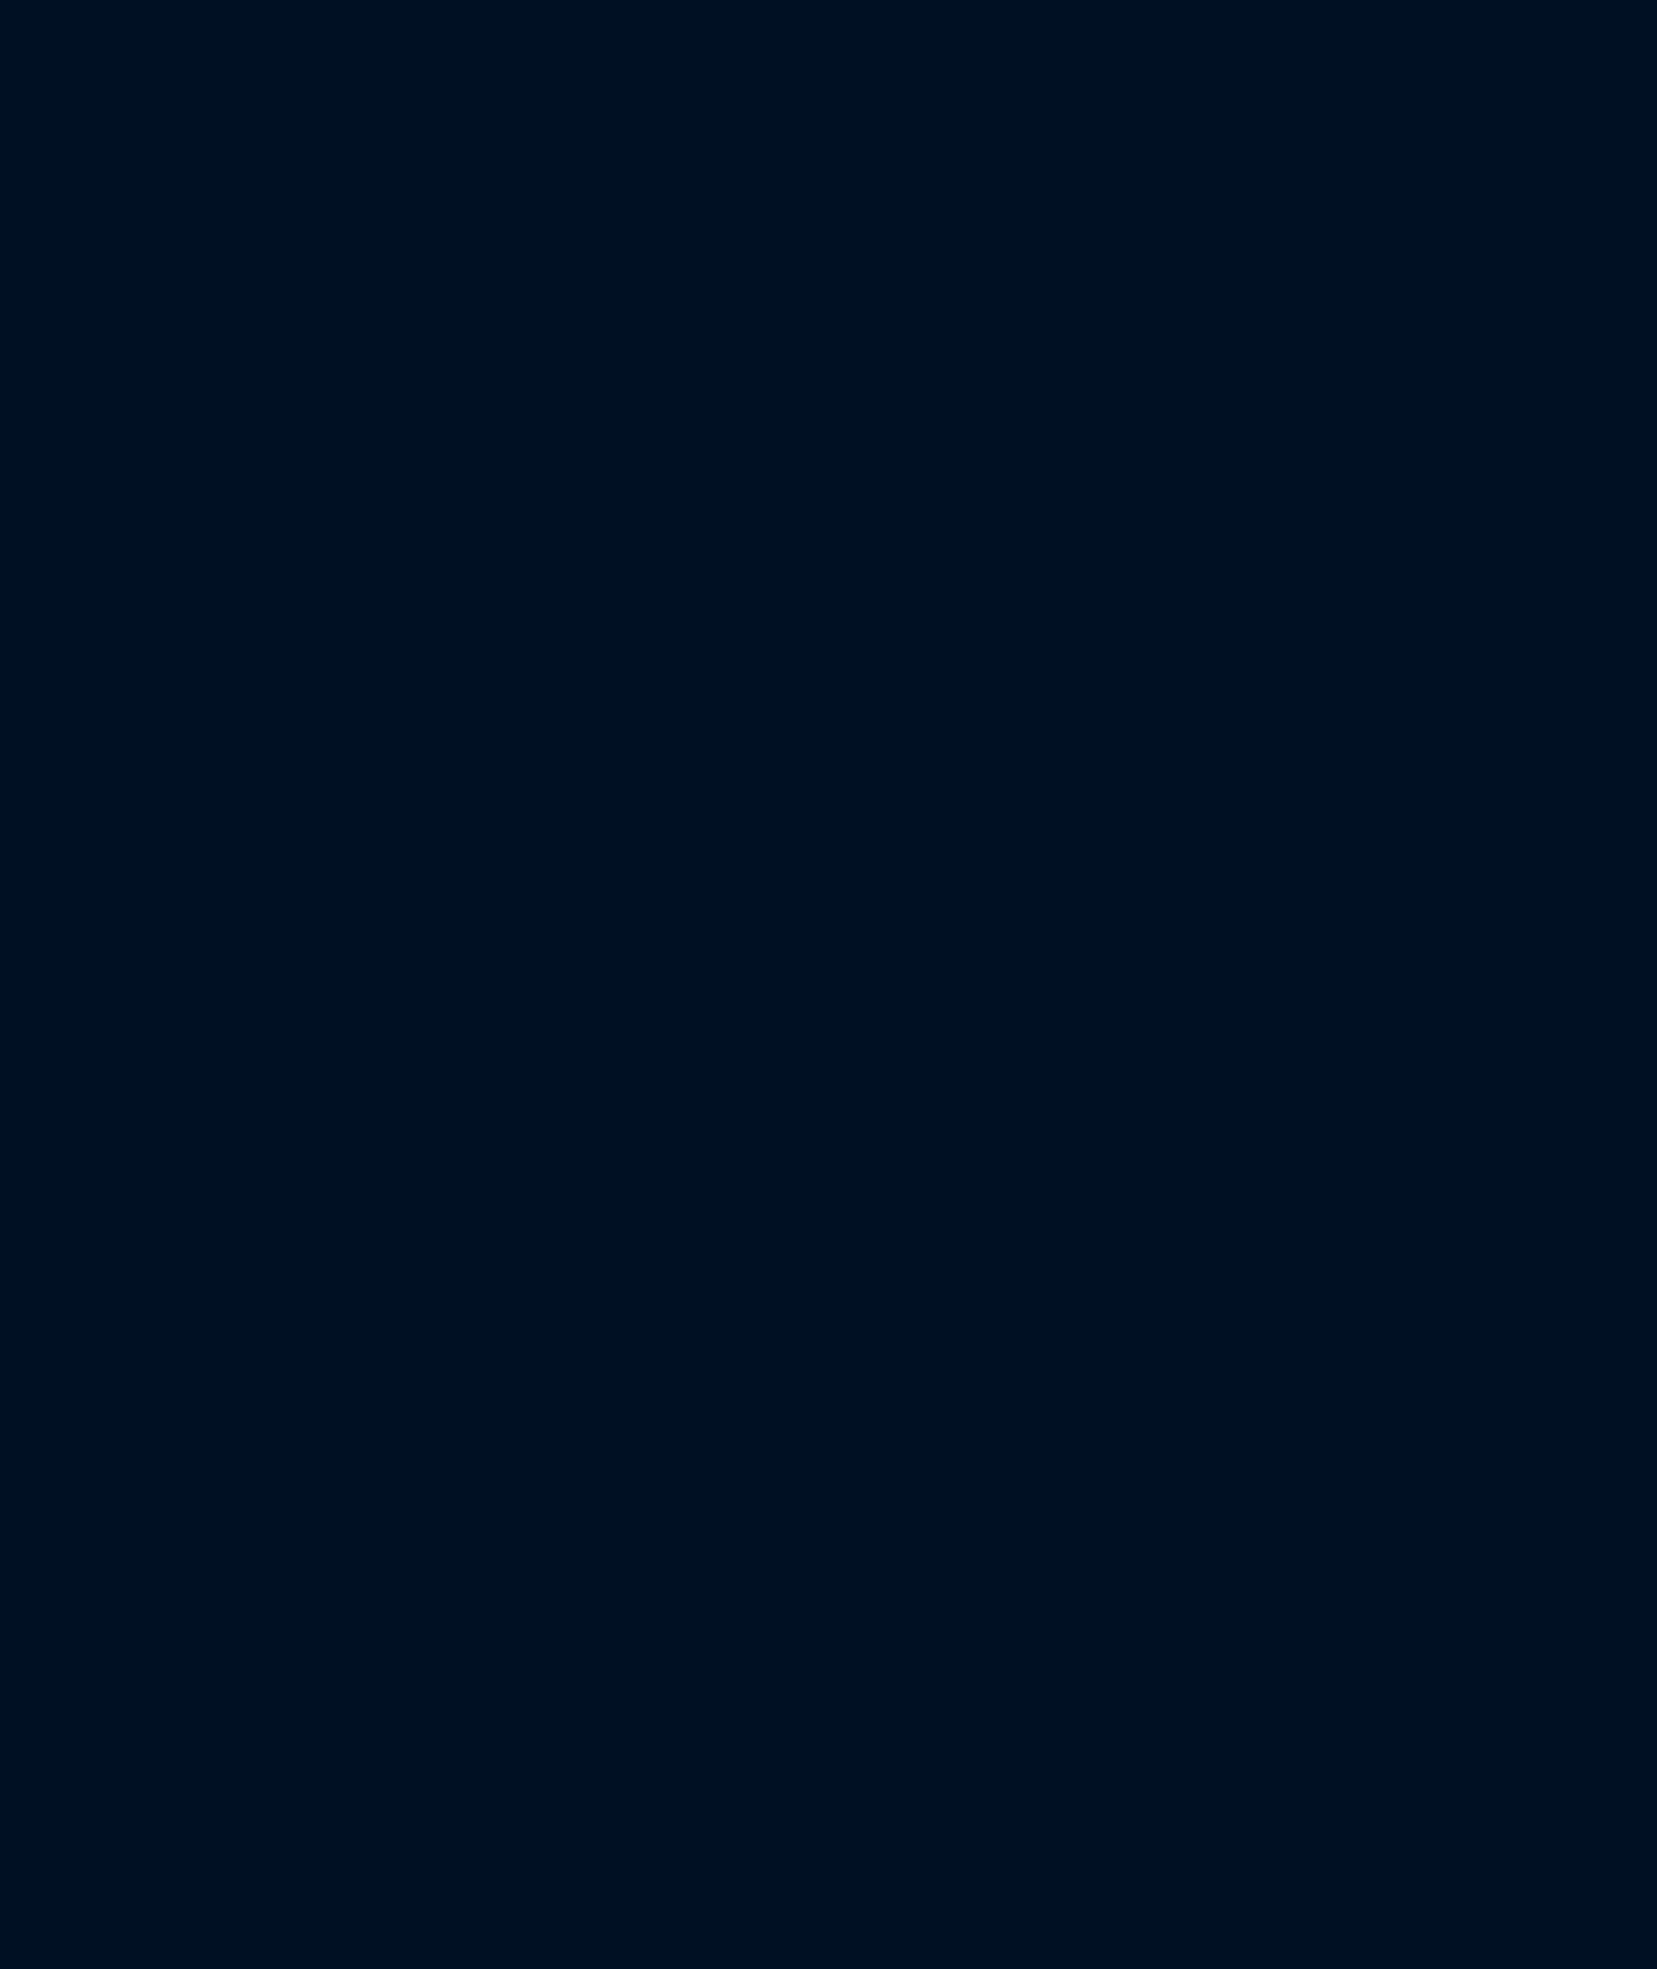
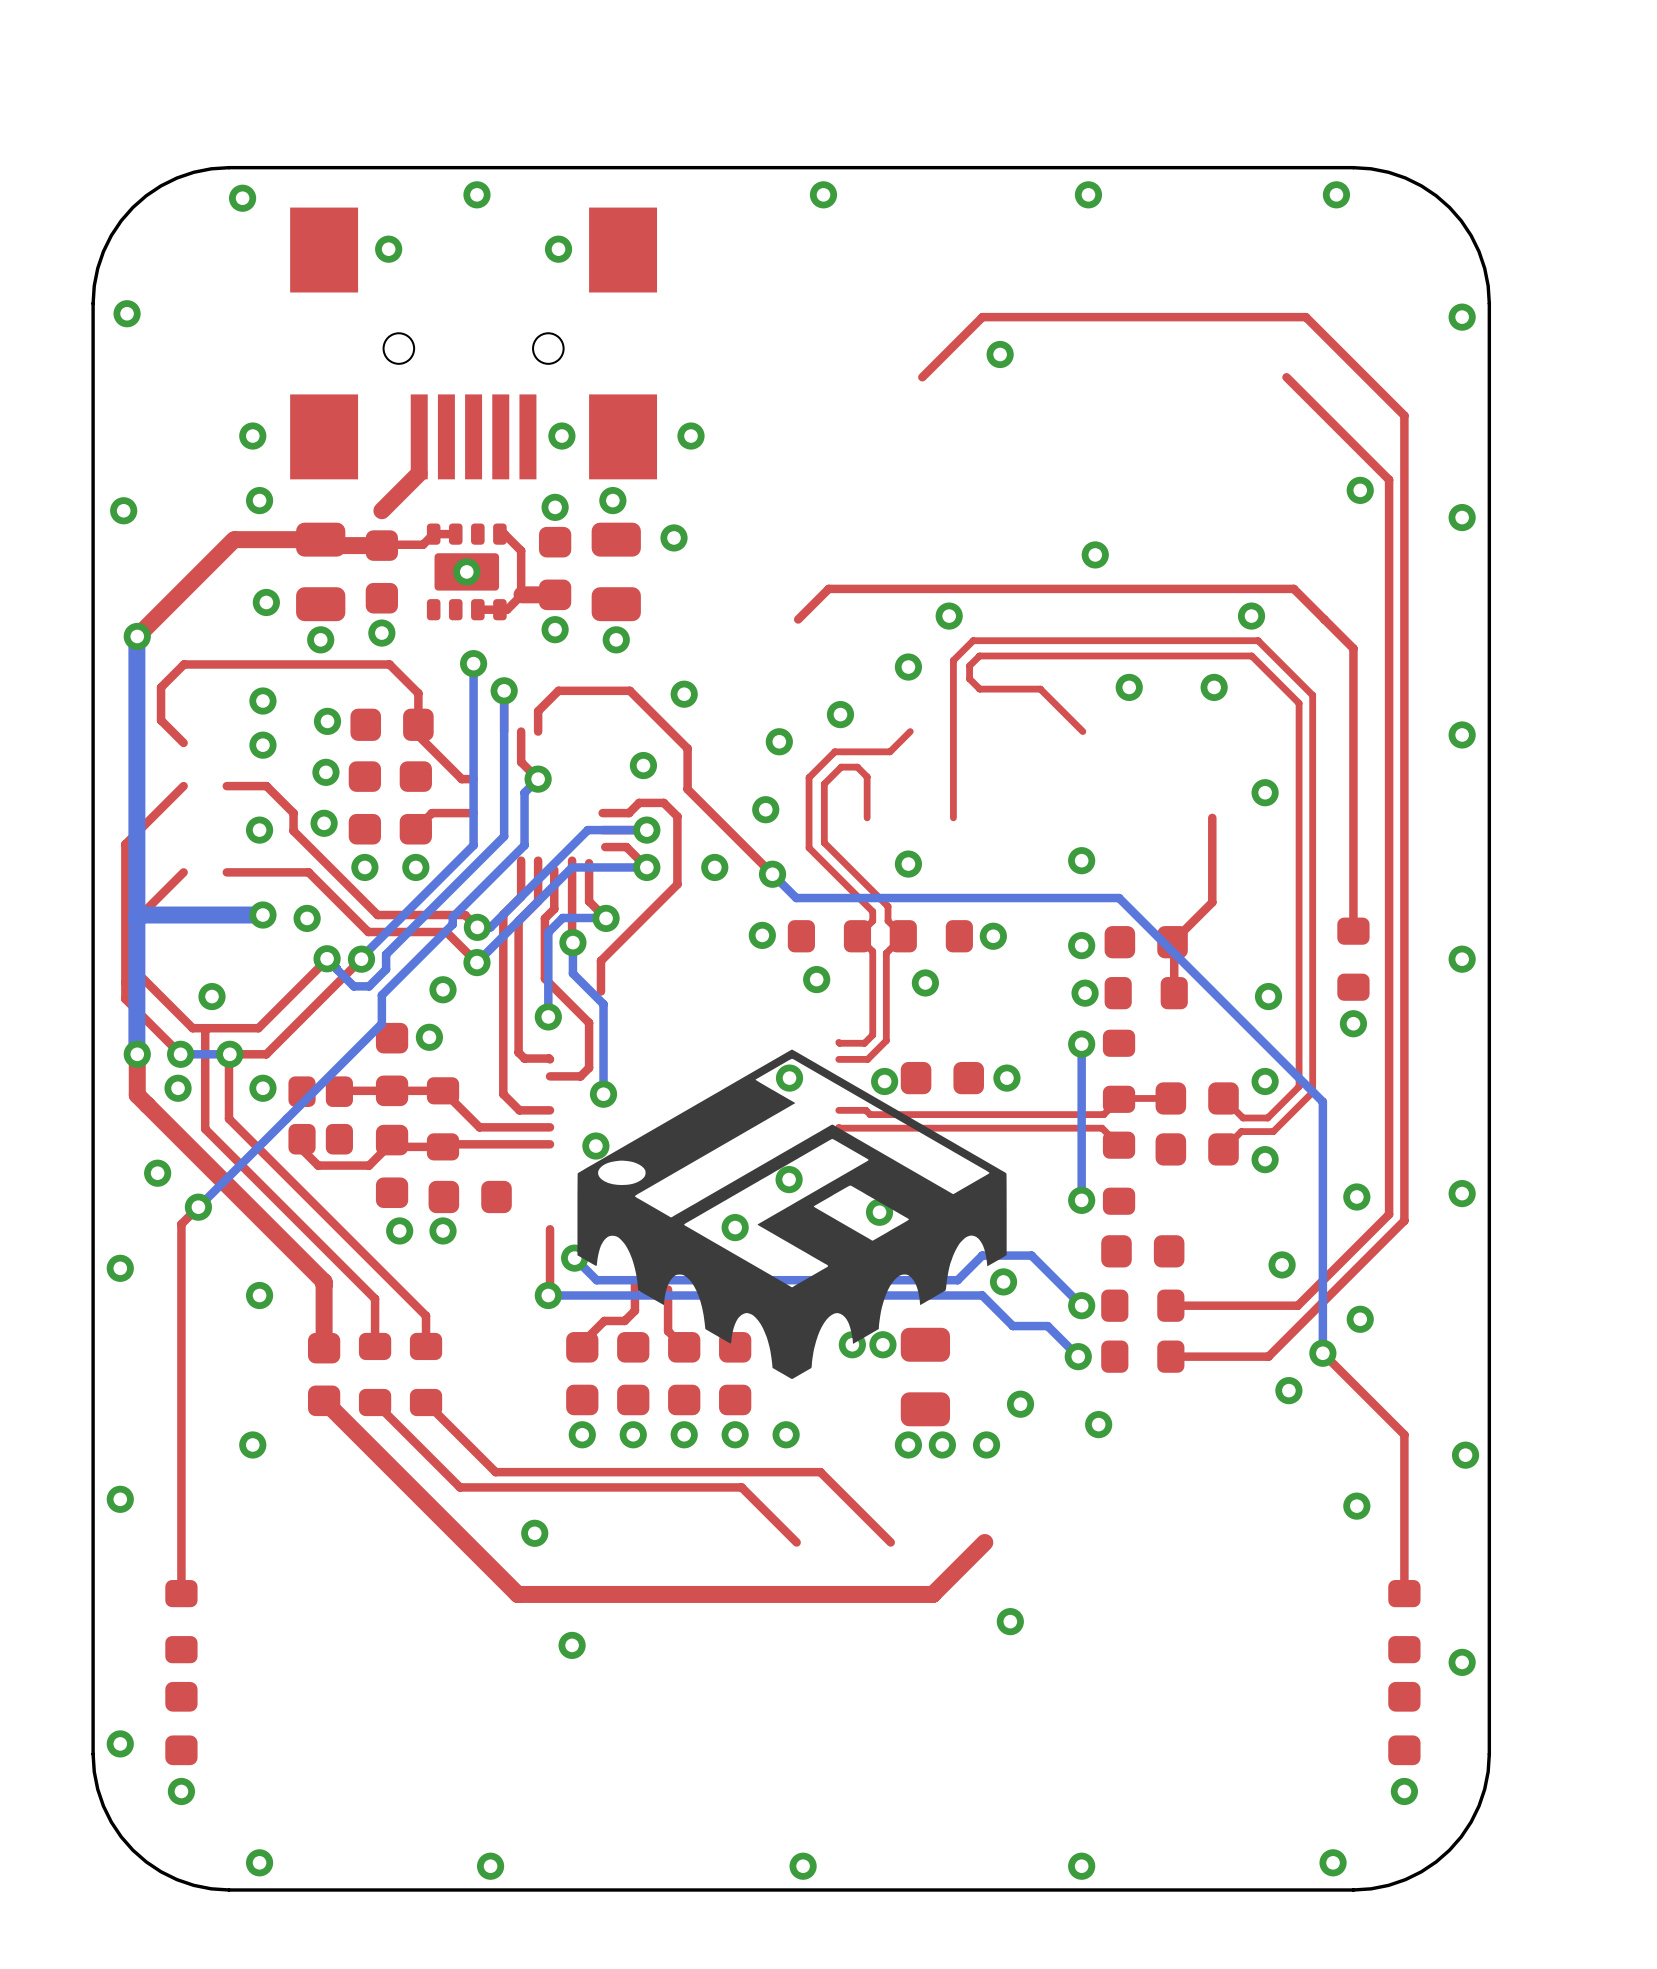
board edge: none -> (1353, 167) (228, 167) (193, 172) (161, 185) (132, 207) (121, 220) (111, 235) (97, 268) (93, 303) (93, 1754) (97, 1789) (111, 1822) (132, 1850) (146, 1861) (161, 1871) (193, 1885) (228, 1890) (1353, 1890) (1388, 1885) (1421, 1871) (1449, 1850) (1461, 1836) (1471, 1822) (1484, 1789) (1489, 1754) (1489, 303) (1488, 285) (1478, 251) (1471, 235) (1449, 207) (1421, 185) (1405, 178) (1371, 168) (1353, 167)
via: none -> (476, 194)
via: none -> (823, 194)
via: none -> (1088, 194)
via: none -> (1336, 194)
via: none -> (242, 198)
via: none -> (388, 249)
via: none -> (558, 249)
via: none -> (127, 313)
via: none -> (1462, 317)
part: none -> (473, 343)
via: none -> (1000, 354)
top track: none -> (922, 377) (982, 317) (1305, 317) (1404, 415) (1404, 1220) (1268, 1356) (1170, 1356)
top track: none -> (1286, 377) (1389, 479) (1389, 1214) (1297, 1305) (1170, 1305)
via: none -> (252, 436)
top track: none -> (419, 436) (419, 473) (381, 510)
via: none -> (561, 436)
via: none -> (691, 436)
via: none -> (1360, 490)
via: none -> (259, 500)
via: none -> (612, 500)
via: none -> (555, 507)
via: none -> (123, 510)
via: none -> (1462, 517)
top track: none -> (455, 534) (433, 534) (423, 544) (326, 545) (320, 539) (235, 539)
top track: none -> (499, 534) (504, 534) (521, 550) (521, 595)
via: none -> (674, 537)
top track: none -> (234, 539) (137, 636)
via: none -> (1095, 554)
part: none -> (555, 568)
part: none -> (320, 571)
part: none -> (381, 571)
part: none -> (466, 571)
via: none -> (466, 571)
part: none -> (616, 571)
top track: none -> (555, 594) (521, 594) (507, 609) (477, 609)
via: none -> (266, 602)
via: none -> (949, 616)
via: none -> (1251, 616)
top track: none -> (798, 619) (828, 588) (1293, 588) (1353, 648) (1353, 931)
via: none -> (555, 629)
via: none -> (381, 633)
bottom track: none -> (136, 636) (136, 1053)
via: none -> (137, 636)
via: none -> (320, 639)
via: none -> (616, 639)
bottom track: none -> (473, 663) (473, 845) (361, 959)
via: none -> (473, 663)
via: none -> (908, 667)
via: none -> (1129, 687)
via: none -> (1214, 687)
bottom track: none -> (504, 690) (504, 836) (386, 954) (386, 969) (369, 986) (353, 986) (327, 958)
via: none -> (504, 690)
via: none -> (684, 694)
via: none -> (262, 701)
via: none -> (840, 714)
via: none -> (327, 721)
part: none -> (392, 724)
top track: none -> (521, 731) (521, 762) (538, 779)
top track: none -> (538, 731) (538, 711) (558, 690) (629, 690) (687, 748) (687, 789) (772, 874)
top track: none -> (910, 731) (890, 751) (834, 751) (809, 777) (809, 847) (872, 911) (872, 920) (857, 936) (872, 951) (872, 1035) (864, 1043) (838, 1042)
top track: none -> (1082, 731) (1040, 689) (979, 689) (969, 678) (969, 665) (979, 655) (1251, 655) (1299, 703) (1299, 1086) (1267, 1118) (1243, 1118) (1223, 1098)
via: none -> (1462, 734)
via: none -> (779, 741)
top track: none -> (183, 742) (161, 720) (161, 687) (183, 664) (389, 664) (418, 693) (418, 735) (461, 779) (473, 779)
via: none -> (262, 745)
via: none -> (643, 765)
via: none -> (325, 772)
bottom track: none -> (538, 779) (524, 792) (524, 845) (452, 917) (452, 924) (381, 995) (381, 1023) (198, 1207)
via: none -> (538, 779)
top track: none -> (183, 786) (125, 844) (125, 999) (180, 1054)
top track: none -> (226, 786) (266, 786) (293, 813) (293, 830) (377, 915) (465, 915) (477, 927)
via: none -> (1265, 792)
part: none -> (364, 802)
part: none -> (415, 802)
via: none -> (765, 809)
top track: none -> (473, 813) (431, 813) (415, 829)
top track: none -> (602, 813) (628, 813) (639, 802) (663, 802) (677, 816) (677, 884) (600, 960) (600, 991)
top track: none -> (867, 817) (867, 776) (857, 767) (841, 767) (824, 784) (824, 842) (888, 906) (888, 920) (903, 936) (886, 953) (886, 1040) (867, 1059) (838, 1059)
top track: none -> (953, 817) (953, 660) (973, 640) (1258, 640) (1312, 695) (1312, 1092) (1273, 1131) (1241, 1131) (1223, 1149)
top track: none -> (1212, 817) (1212, 902) (1172, 942) (1174, 943) (1174, 993)
via: none -> (324, 823)
via: none -> (259, 830)
bottom track: none -> (646, 830) (587, 830) (490, 927) (477, 927)
via: none -> (646, 830)
top track: none -> (605, 847) (626, 847) (646, 867)
top track: none -> (521, 860) (521, 896) (503, 914) (503, 1094) (519, 1110) (550, 1110)
top track: none -> (538, 860) (538, 901) (518, 920) (518, 1052) (524, 1058) (550, 1059)
top track: none -> (572, 860) (572, 942)
via: none -> (1081, 860)
top track: none -> (589, 863) (589, 901) (606, 918)
via: none -> (908, 864)
via: none -> (364, 867)
via: none -> (415, 867)
bottom track: none -> (646, 867) (572, 867) (476, 962)
via: none -> (646, 867)
via: none -> (714, 867)
top track: none -> (554, 870) (554, 909) (544, 918) (544, 978) (589, 1022) (589, 1067) (580, 1076) (550, 1076)
top track: none -> (183, 872) (140, 915) (140, 976) (192, 1028) (258, 1028) (327, 958)
top track: none -> (226, 872) (308, 872) (368, 932) (446, 932) (476, 962)
bottom track: none -> (772, 874) (796, 898) (1119, 898) (1322, 1101) (1322, 1353)
via: none -> (772, 874)
bottom track: none -> (262, 915) (139, 915) (136, 918)
via: none -> (262, 915)
bottom track: none -> (605, 917) (562, 917) (548, 932) (548, 1016)
via: none -> (307, 918)
via: none -> (606, 918)
via: none -> (477, 927)
via: none -> (762, 935)
part: none -> (829, 936)
part: none -> (931, 936)
via: none -> (993, 936)
bottom track: none -> (572, 942) (572, 973) (603, 1004) (603, 1094)
via: none -> (572, 942)
part: none -> (1146, 942)
via: none -> (1081, 945)
via: none -> (327, 958)
top track: none -> (361, 959) (266, 1054) (228, 1054) (228, 1118) (426, 1315) (426, 1346)
via: none -> (361, 959)
part: none -> (1353, 959)
via: none -> (1462, 959)
via: none -> (476, 962)
via: none -> (816, 979)
via: none -> (925, 982)
via: none -> (443, 989)
via: none -> (1085, 993)
part: none -> (1146, 993)
via: none -> (212, 996)
via: none -> (1268, 996)
via: none -> (548, 1016)
via: none -> (1353, 1023)
top track: none -> (207, 1028) (205, 1030) (205, 1129) (375, 1298) (375, 1346)
via: none -> (429, 1037)
bottom track: none -> (1081, 1044) (1081, 1200)
via: none -> (1081, 1044)
drawing: none -> [577, 1049, 1007, 1380]
top track: none -> (137, 1054) (137, 1095) (324, 1281) (324, 1348)
via: none -> (137, 1054)
via: none -> (180, 1054)
bottom track: none -> (229, 1054) (180, 1054)
via: none -> (229, 1054)
part: none -> (392, 1064)
part: none -> (1119, 1071)
via: none -> (789, 1078)
part: none -> (942, 1078)
via: none -> (1006, 1078)
via: none -> (884, 1081)
via: none -> (1265, 1081)
via: none -> (178, 1088)
via: none -> (262, 1088)
top track: none -> (339, 1091) (443, 1090) (479, 1127) (550, 1127)
via: none -> (603, 1094)
top track: none -> (1167, 1098) (1119, 1098) (1103, 1114) (870, 1114) (865, 1110) (838, 1110)
part: none -> (1197, 1098)
part: none -> (320, 1115)
part: none -> (443, 1118)
top track: none -> (838, 1127) (1102, 1128) (1122, 1148)
top track: none -> (302, 1139) (302, 1149) (318, 1165) (369, 1165) (392, 1142) (392, 1140) (398, 1146) (443, 1146) (445, 1144) (550, 1144)
via: none -> (595, 1146)
part: none -> (1197, 1149)
via: none -> (1265, 1159)
part: none -> (392, 1166)
via: none -> (157, 1173)
part: none -> (1119, 1173)
via: none -> (789, 1179)
via: none -> (1462, 1193)
part: none -> (470, 1196)
via: none -> (1356, 1196)
via: none -> (1081, 1200)
top track: none -> (198, 1207) (181, 1224) (181, 1593)
via: none -> (198, 1207)
via: none -> (879, 1212)
via: none -> (735, 1227)
top track: none -> (550, 1229) (550, 1293) (548, 1295)
via: none -> (399, 1230)
via: none -> (443, 1230)
part: none -> (1142, 1251)
bottom track: none -> (574, 1258) (596, 1280) (957, 1280) (982, 1255) (1031, 1255) (1081, 1305)
via: none -> (574, 1258)
via: none -> (1282, 1264)
via: none -> (120, 1268)
top track: none -> (634, 1280) (634, 1310) (624, 1320) (604, 1320) (582, 1343) (582, 1347)
via: none -> (1003, 1281)
top track: none -> (668, 1289) (668, 1331) (684, 1347)
via: none -> (259, 1295)
bottom track: none -> (548, 1295) (982, 1295) (1012, 1326) (1047, 1326) (1078, 1356)
via: none -> (548, 1295)
via: none -> (1081, 1305)
part: none -> (1142, 1305)
via: none -> (1360, 1319)
via: none -> (852, 1344)
via: none -> (882, 1344)
top track: none -> (1322, 1353) (1404, 1434) (1404, 1593)
via: none -> (1322, 1353)
via: none -> (1078, 1356)
part: none -> (1142, 1356)
part: none -> (582, 1373)
part: none -> (633, 1373)
part: none -> (684, 1373)
part: none -> (735, 1373)
part: none -> (324, 1374)
part: none -> (375, 1374)
part: none -> (426, 1374)
part: none -> (925, 1377)
via: none -> (1288, 1390)
top track: none -> (324, 1400) (517, 1594) (932, 1594) (984, 1542)
top track: none -> (375, 1402) (459, 1487) (741, 1487) (796, 1542)
top track: none -> (426, 1402) (495, 1472) (820, 1472) (890, 1542)
via: none -> (1020, 1404)
via: none -> (1098, 1424)
via: none -> (582, 1434)
via: none -> (633, 1434)
via: none -> (684, 1434)
via: none -> (735, 1434)
via: none -> (786, 1434)
via: none -> (252, 1444)
via: none -> (908, 1444)
via: none -> (942, 1444)
via: none -> (986, 1444)
via: none -> (1465, 1455)
via: none -> (120, 1499)
via: none -> (1356, 1506)
via: none -> (534, 1533)
part: none -> (181, 1621)
via: none -> (1010, 1621)
part: none -> (1404, 1621)
via: none -> (572, 1645)
via: none -> (1462, 1662)
part: none -> (181, 1723)
part: none -> (1404, 1723)
via: none -> (120, 1743)
via: none -> (181, 1791)
via: none -> (1404, 1791)
via: none -> (259, 1862)
via: none -> (1333, 1862)
via: none -> (490, 1866)
via: none -> (803, 1866)
via: none -> (1081, 1866)

